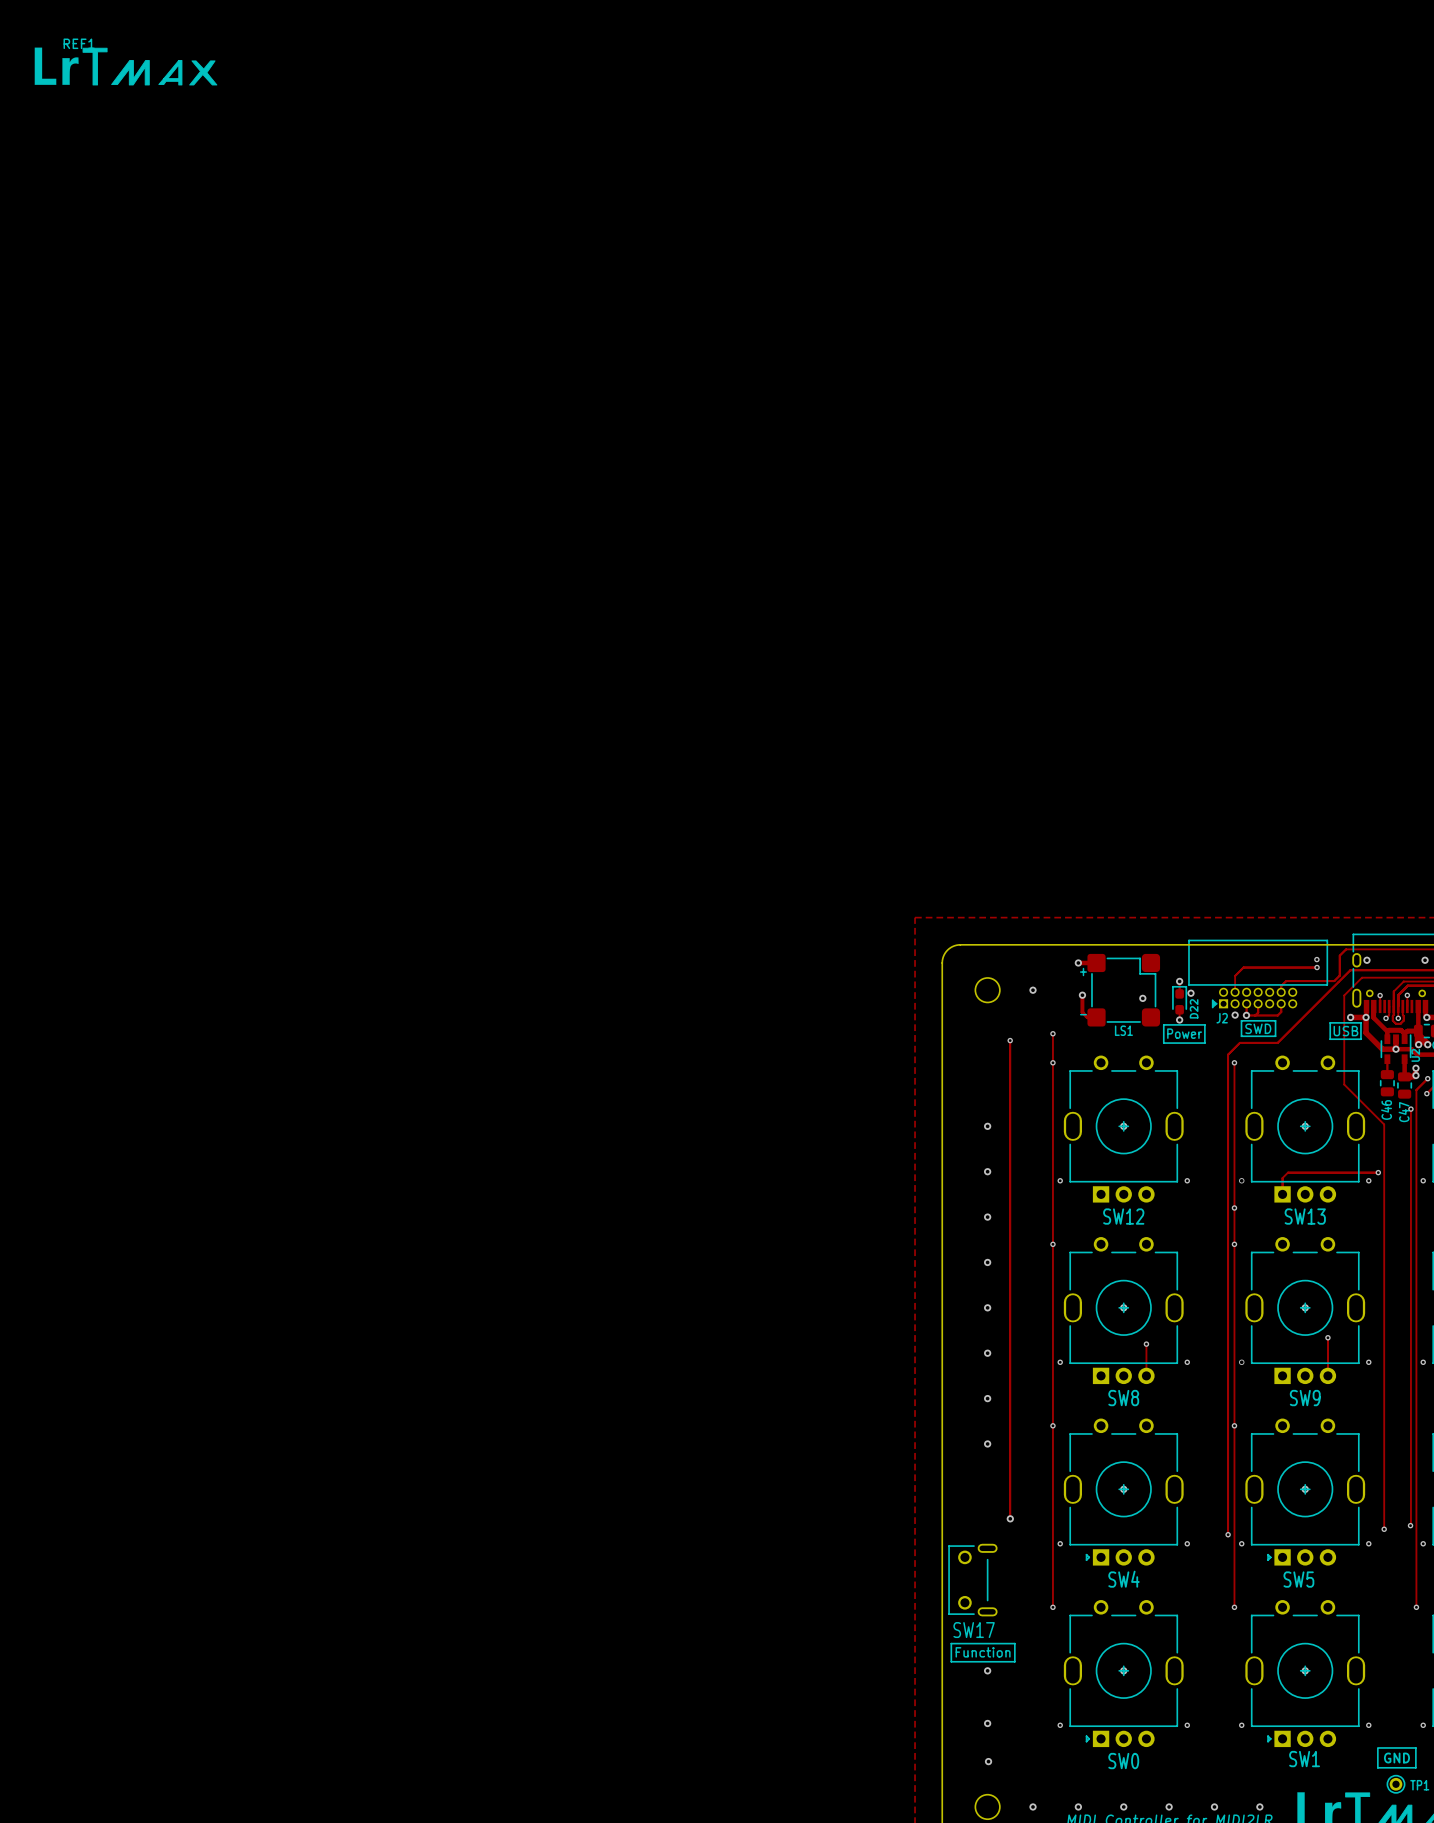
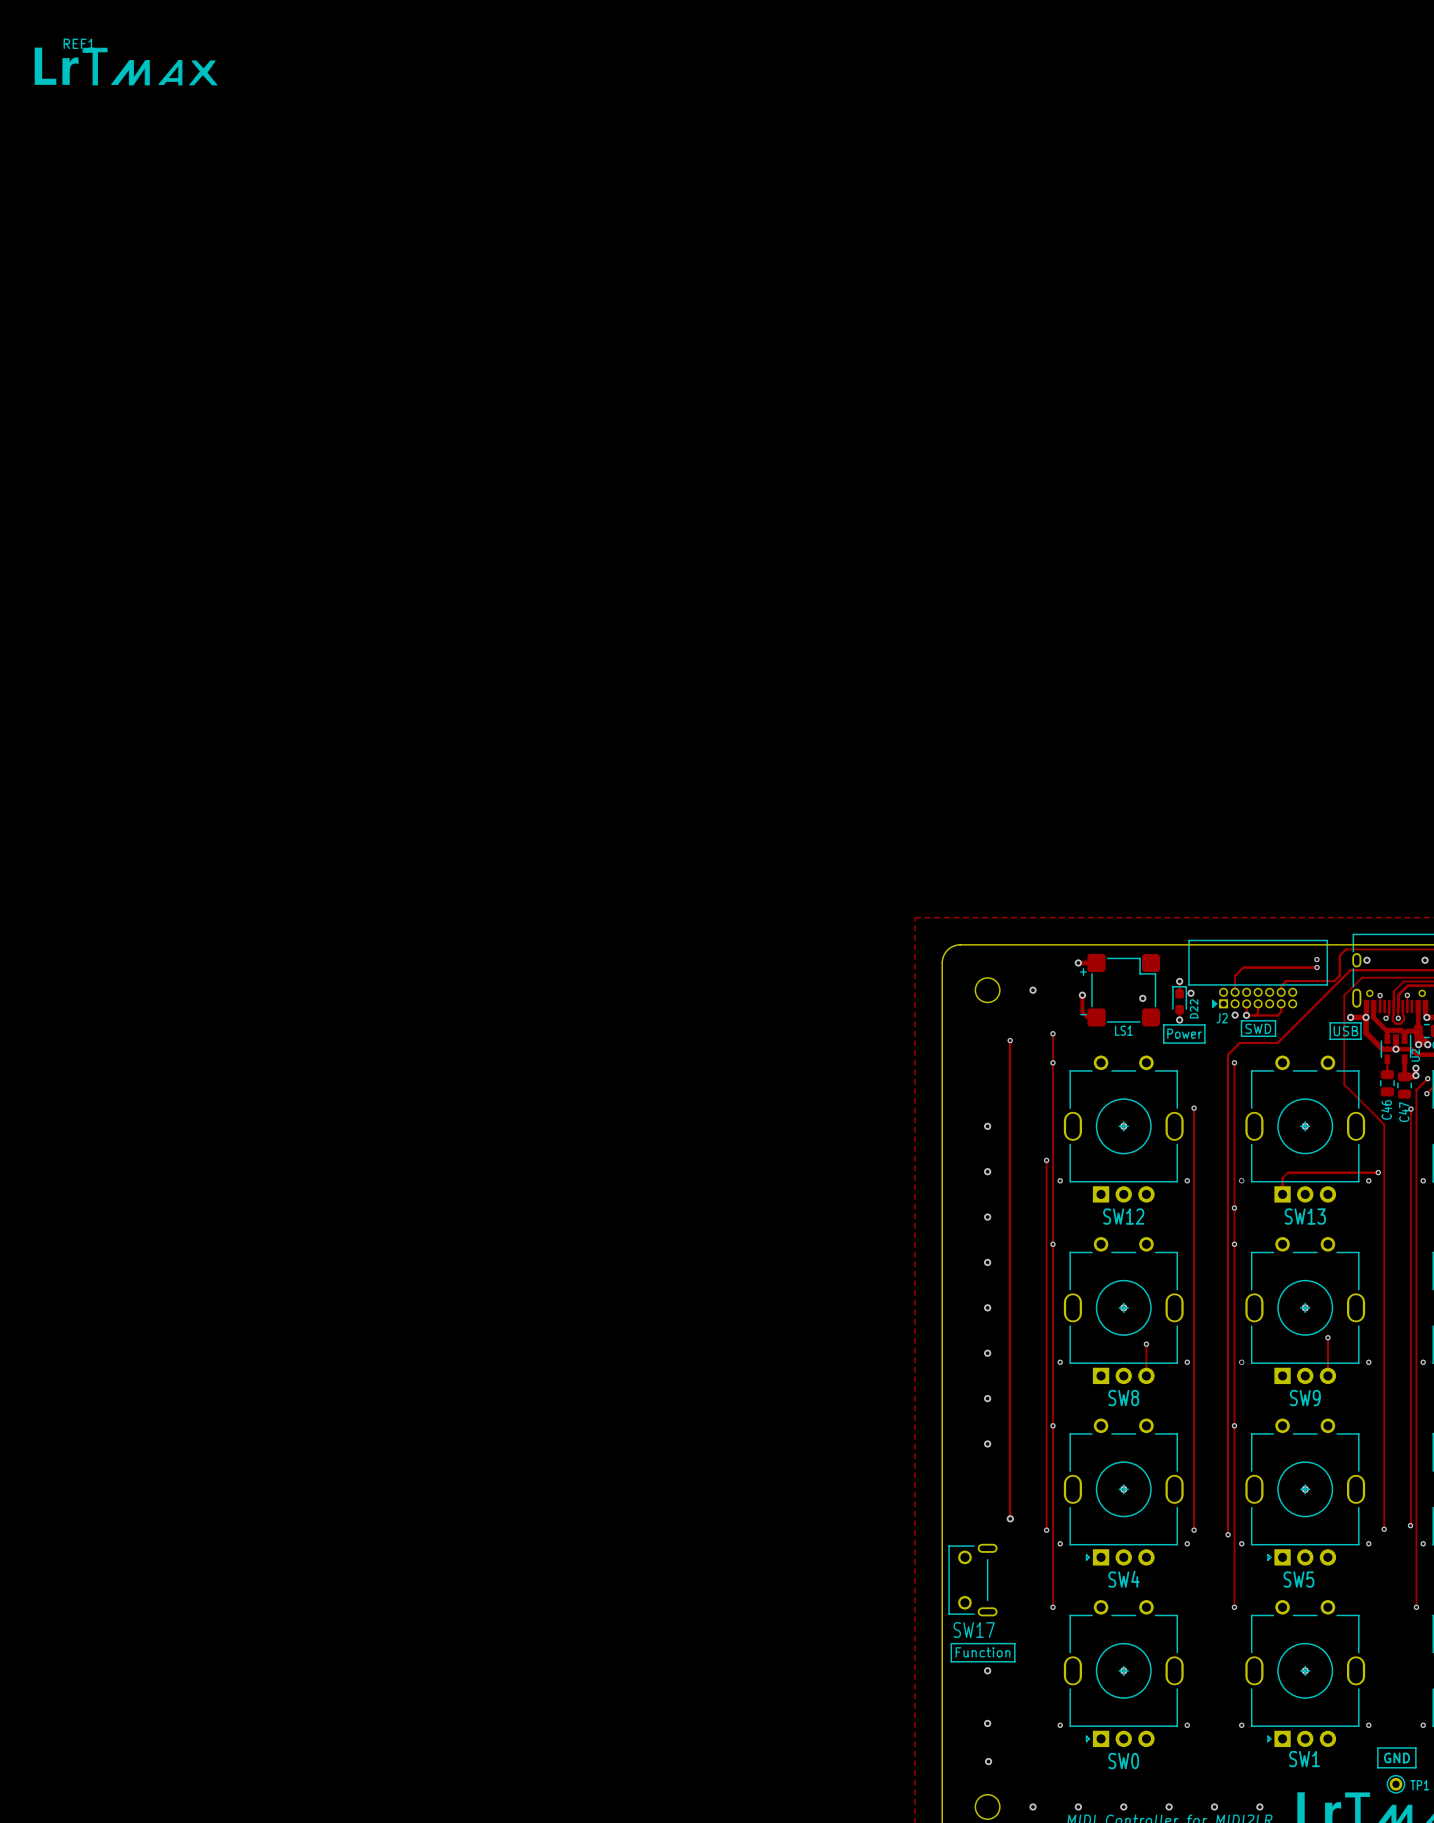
track: none -> (1194, 1108) (1194, 1530)
via: none -> (1194, 1108)
track: none -> (1046, 1160) (1046, 1530)
via: none -> (1046, 1160)
via: none -> (1046, 1530)
via: none -> (1194, 1530)

